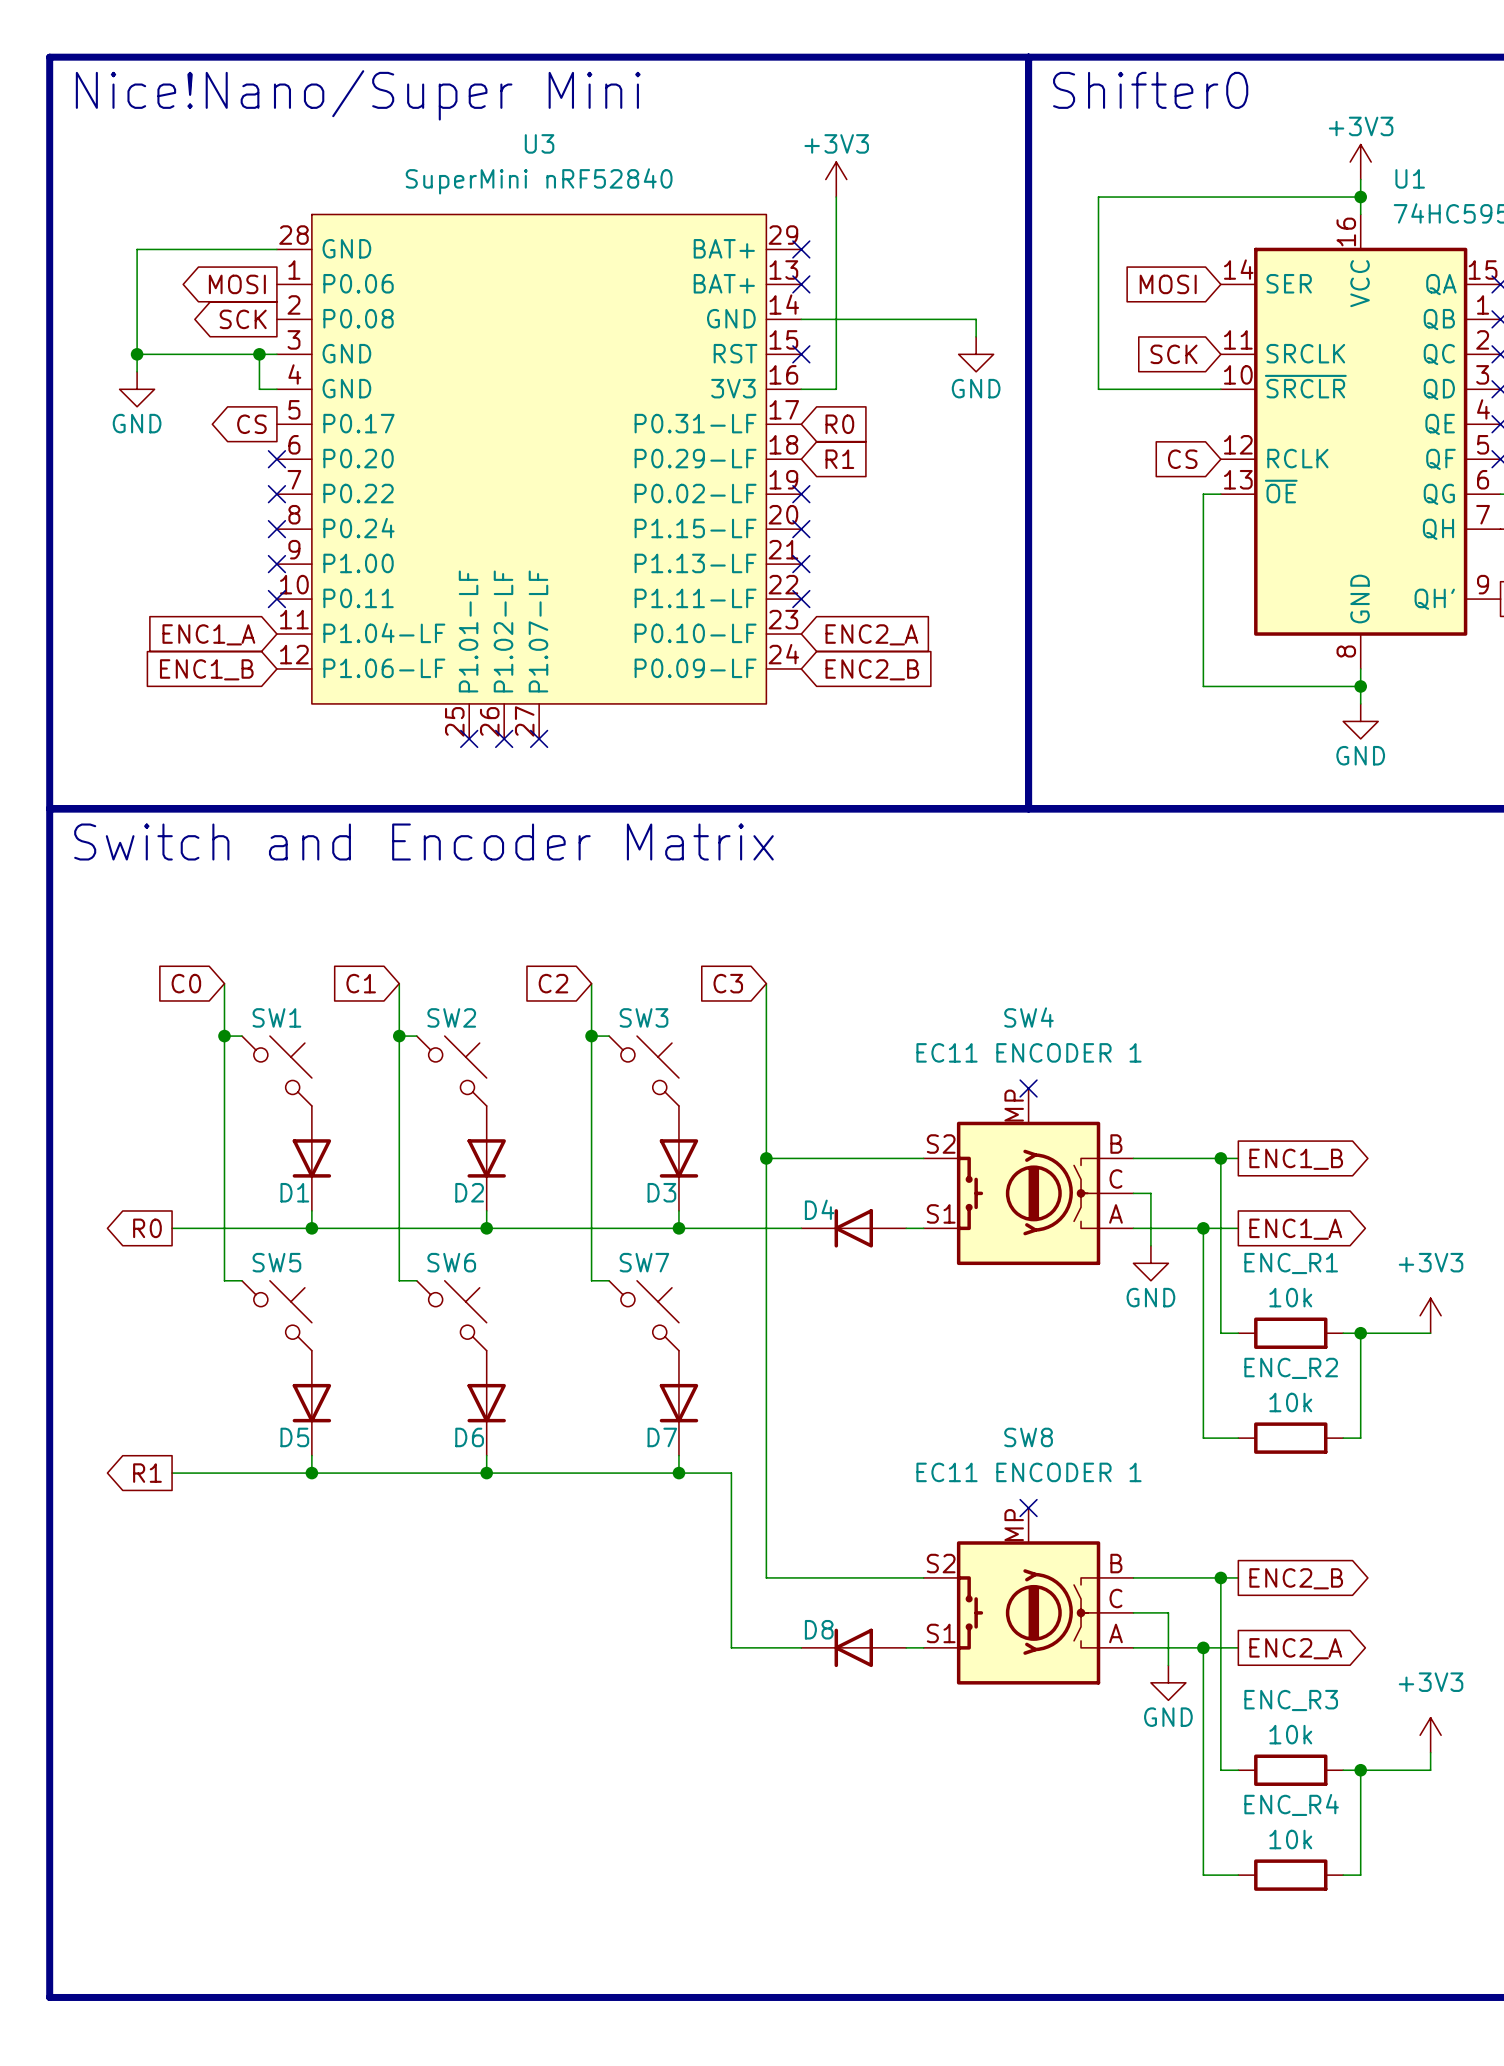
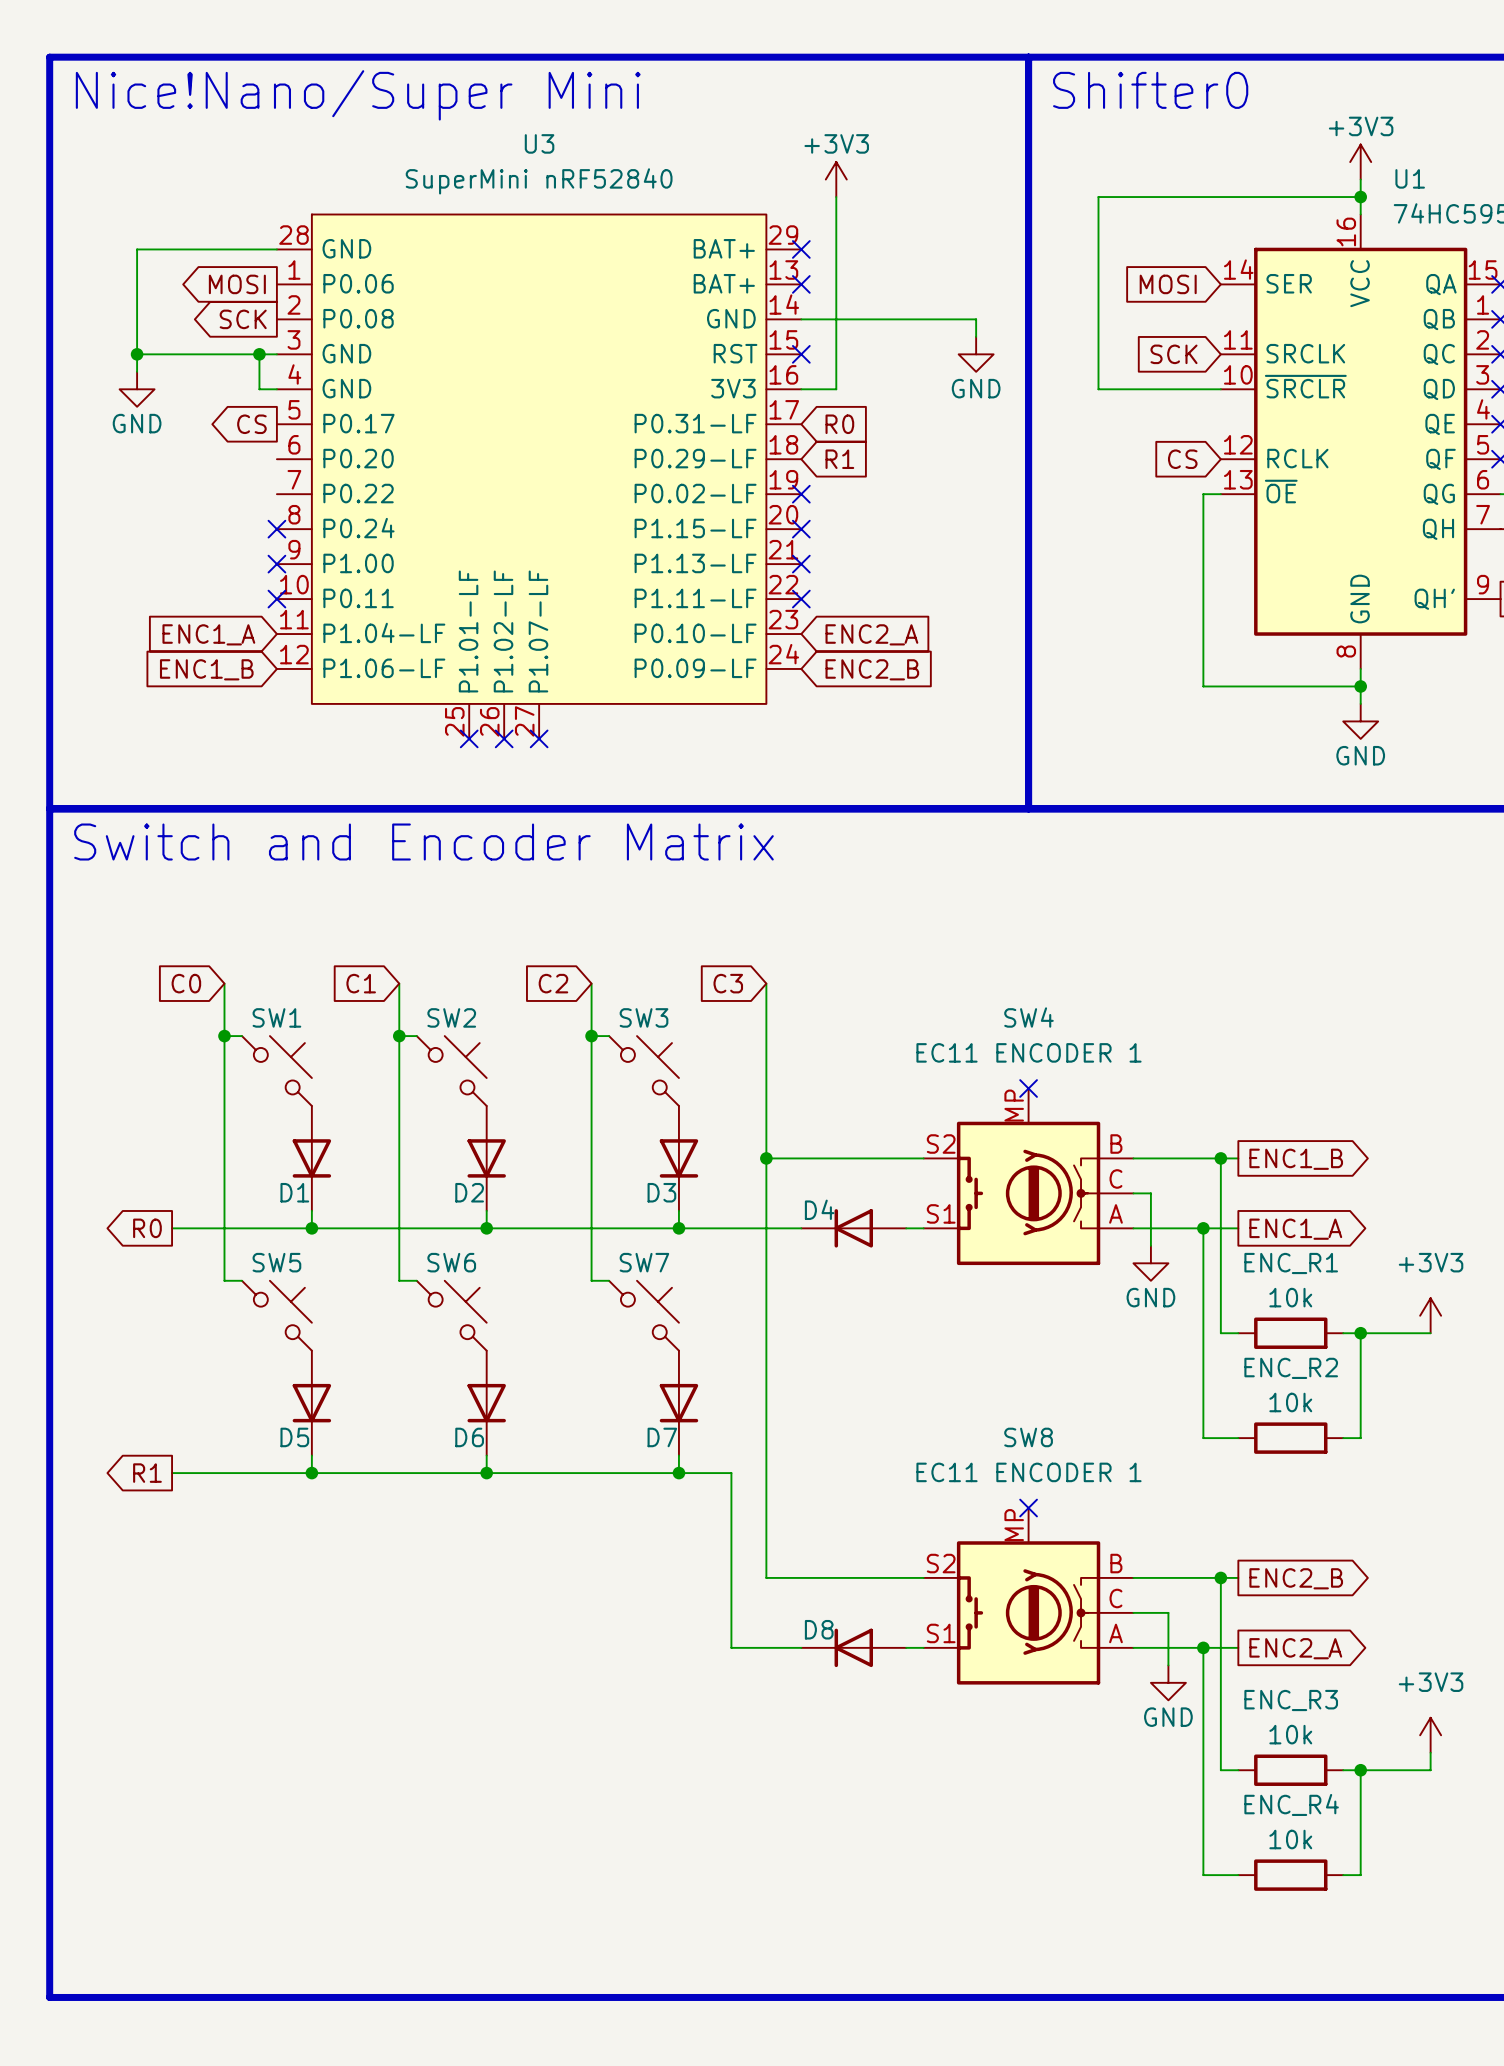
no-connect mark: (276, 459) -> none
no-connect mark: (276, 494) -> none

